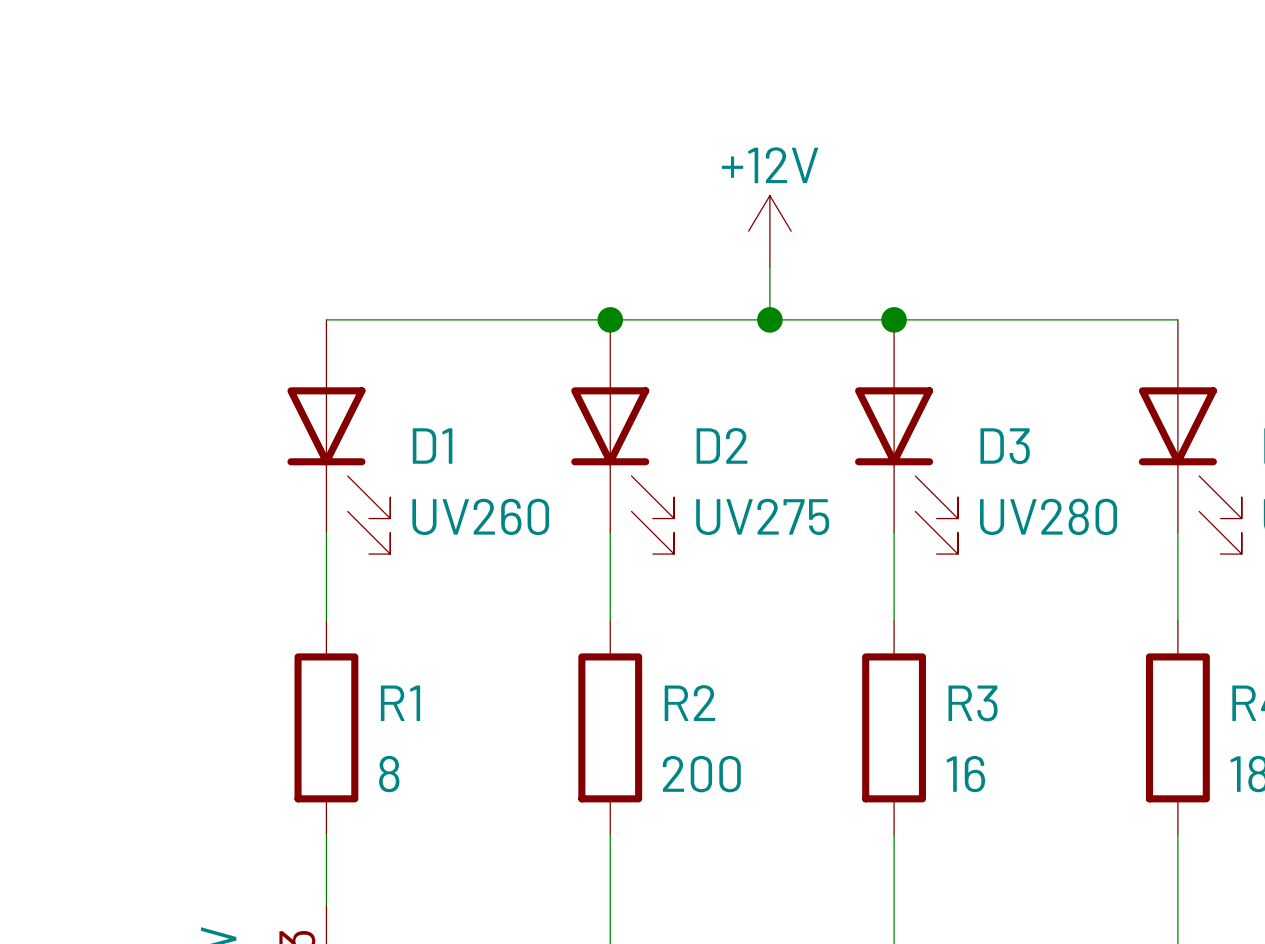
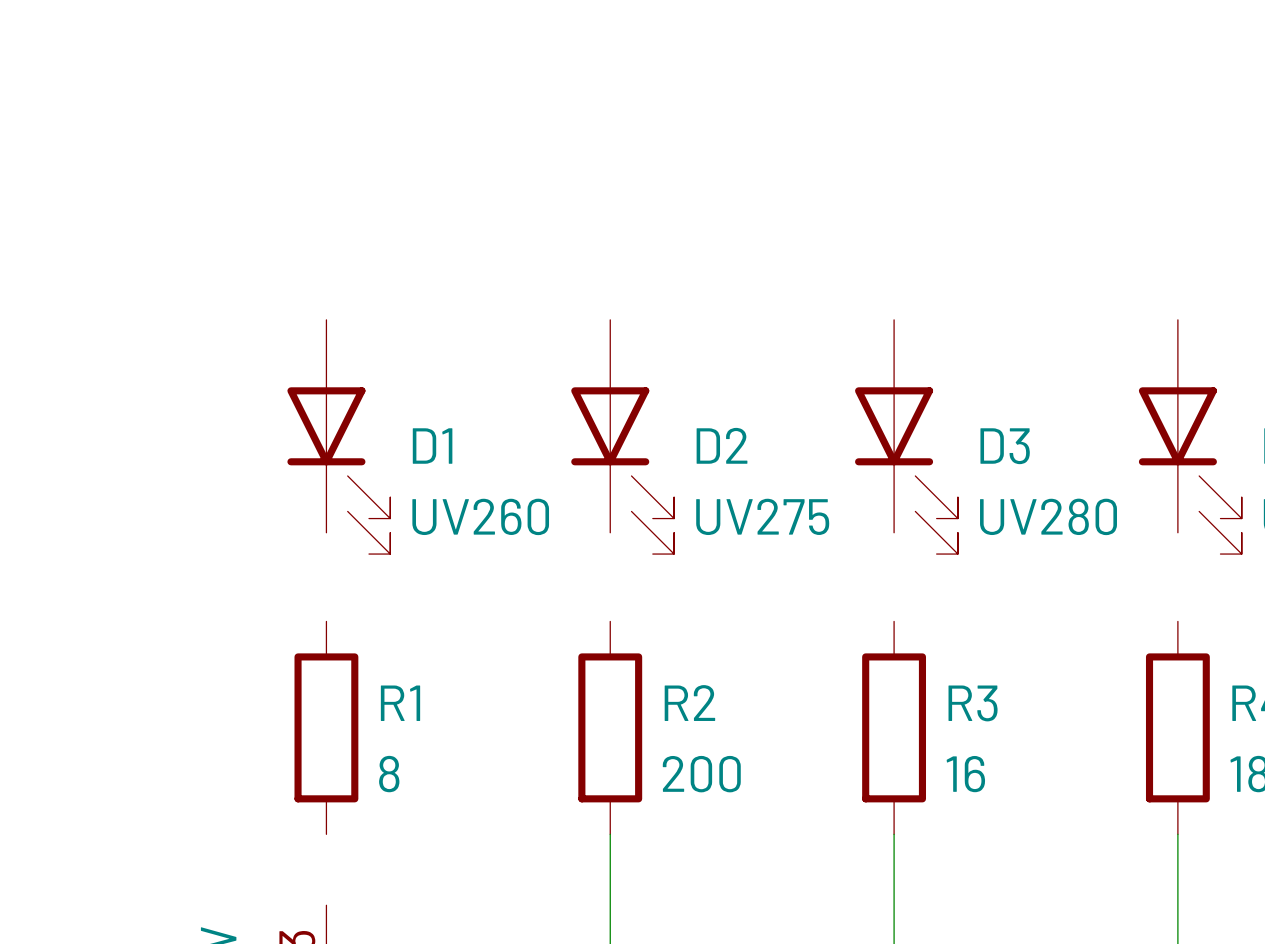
power symbol: +12V (769, 231) -> none
wire: (769, 266) (769, 319) -> none
wire: (326, 319) (1177, 319) -> none
junction: (610, 319) -> none
junction: (769, 319) -> none
junction: (894, 319) -> none
wire: (326, 532) (326, 621) -> none
wire: (610, 532) (610, 621) -> none
wire: (894, 532) (894, 621) -> none
wire: (1177, 532) (1177, 621) -> none
wire: (326, 834) (326, 905) -> none

